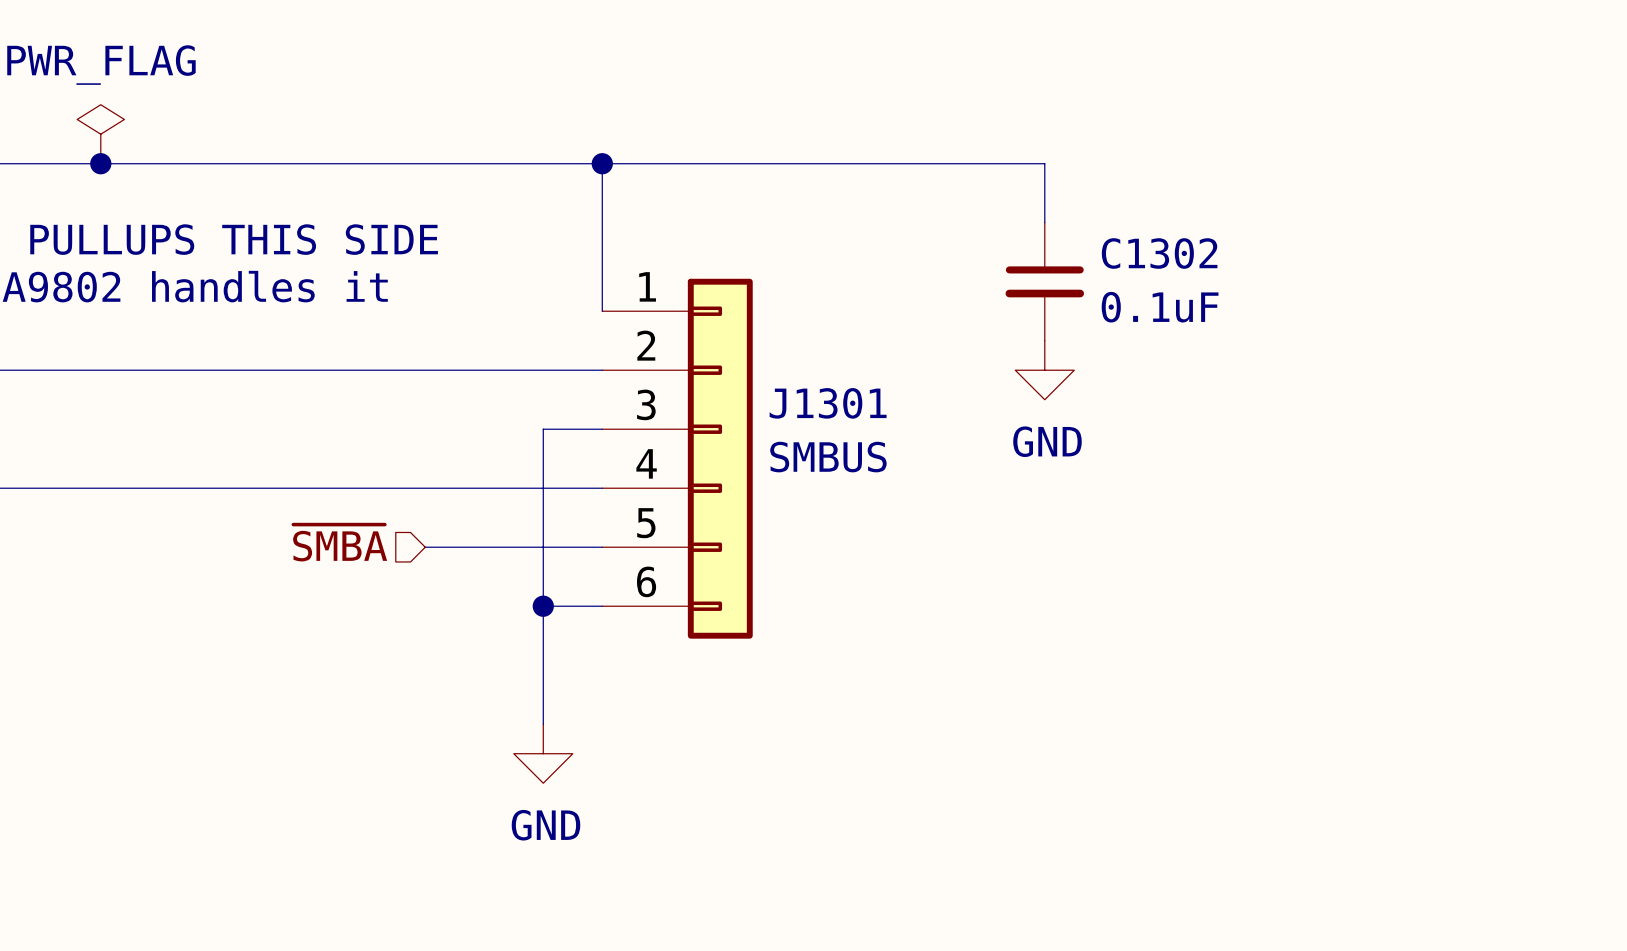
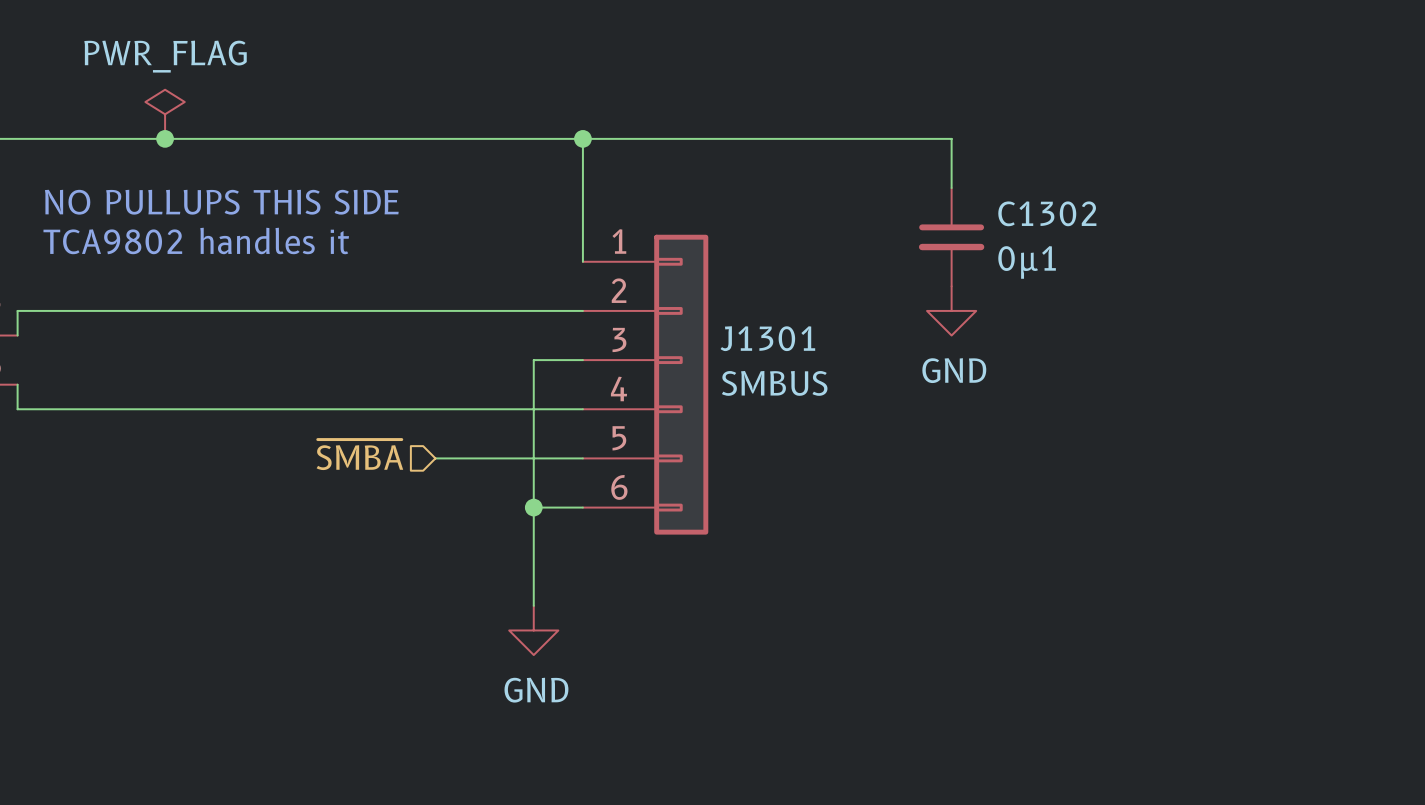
C1302 value: 0.1uF (1160, 307) -> 0µ1 (1027, 262)

